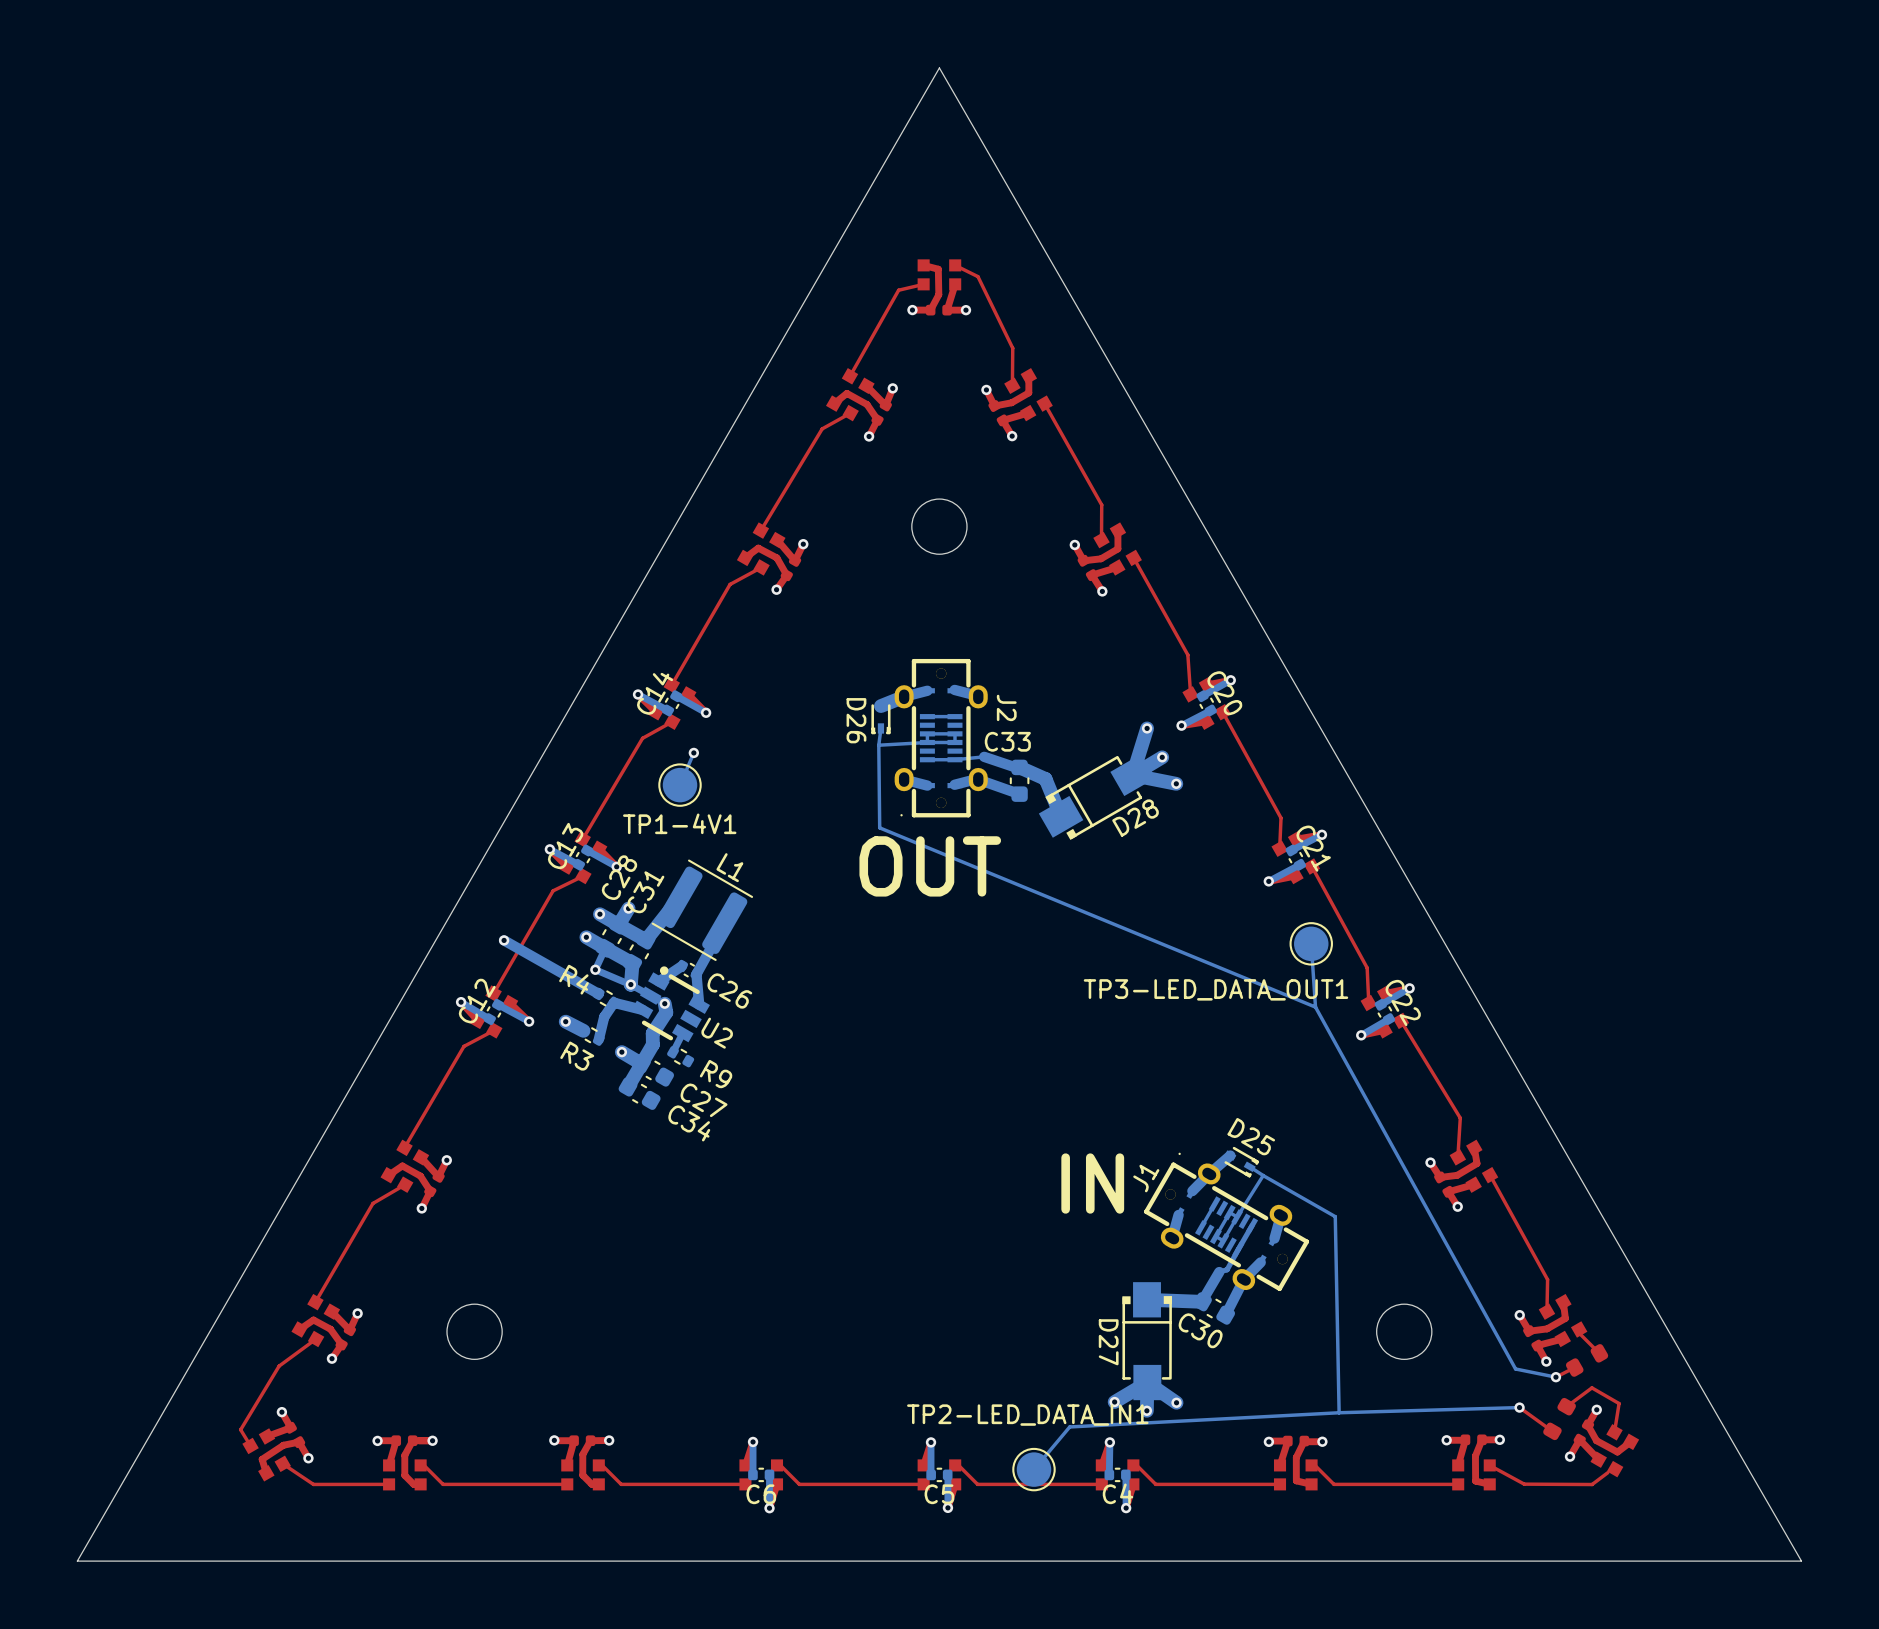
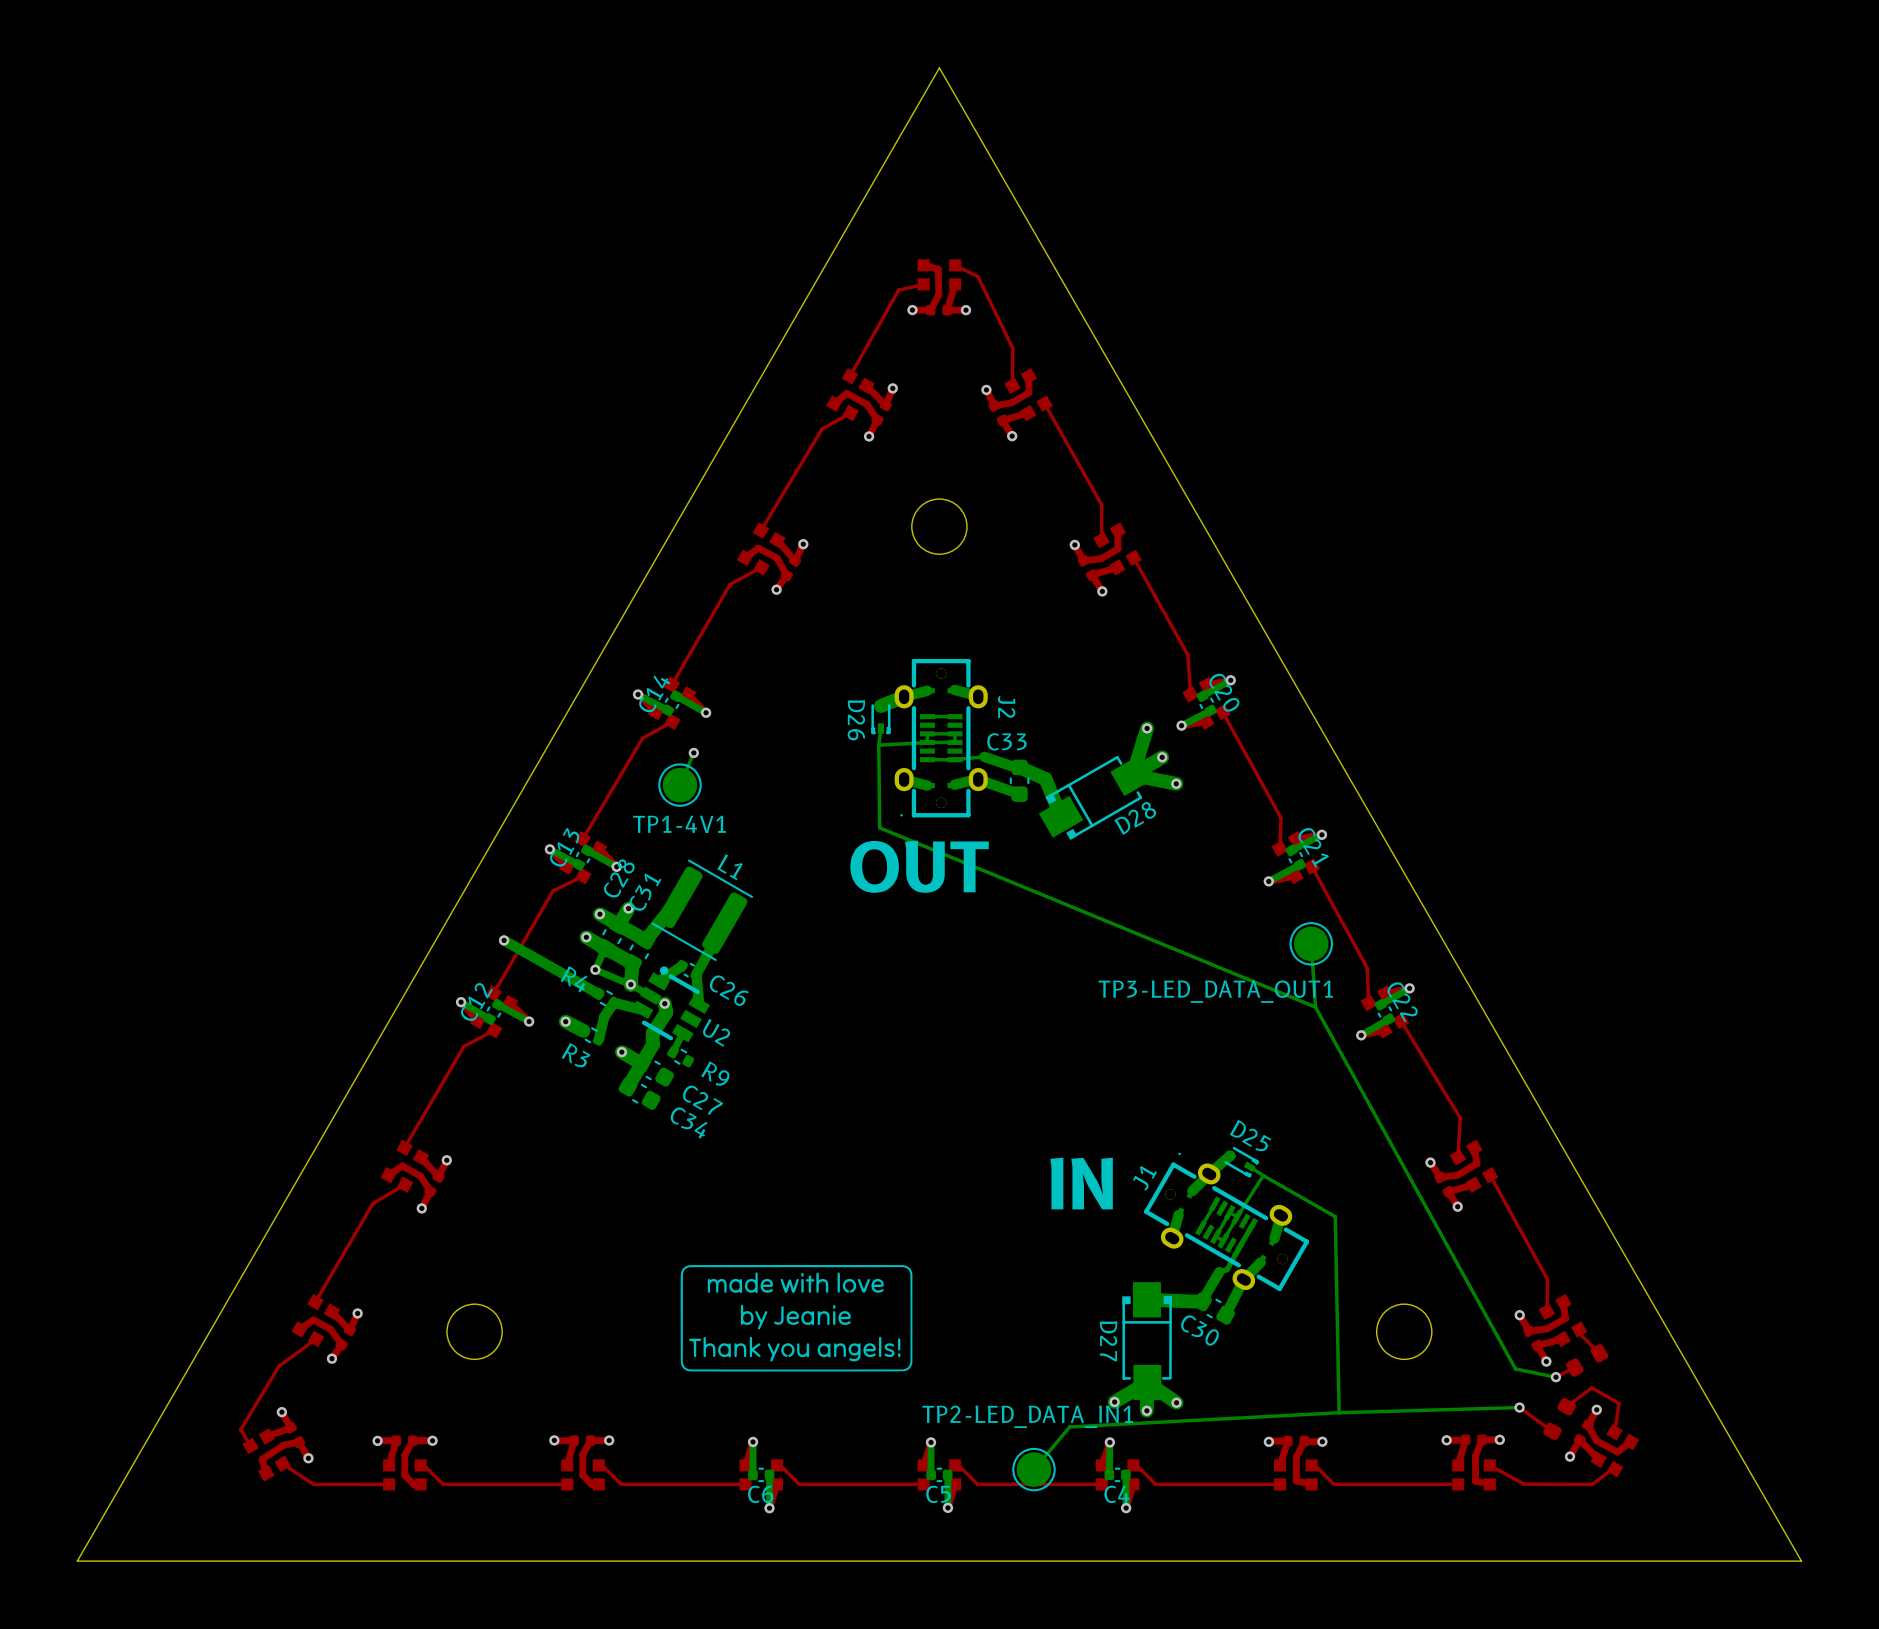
drawing: none -> [680, 1265, 913, 1372]

